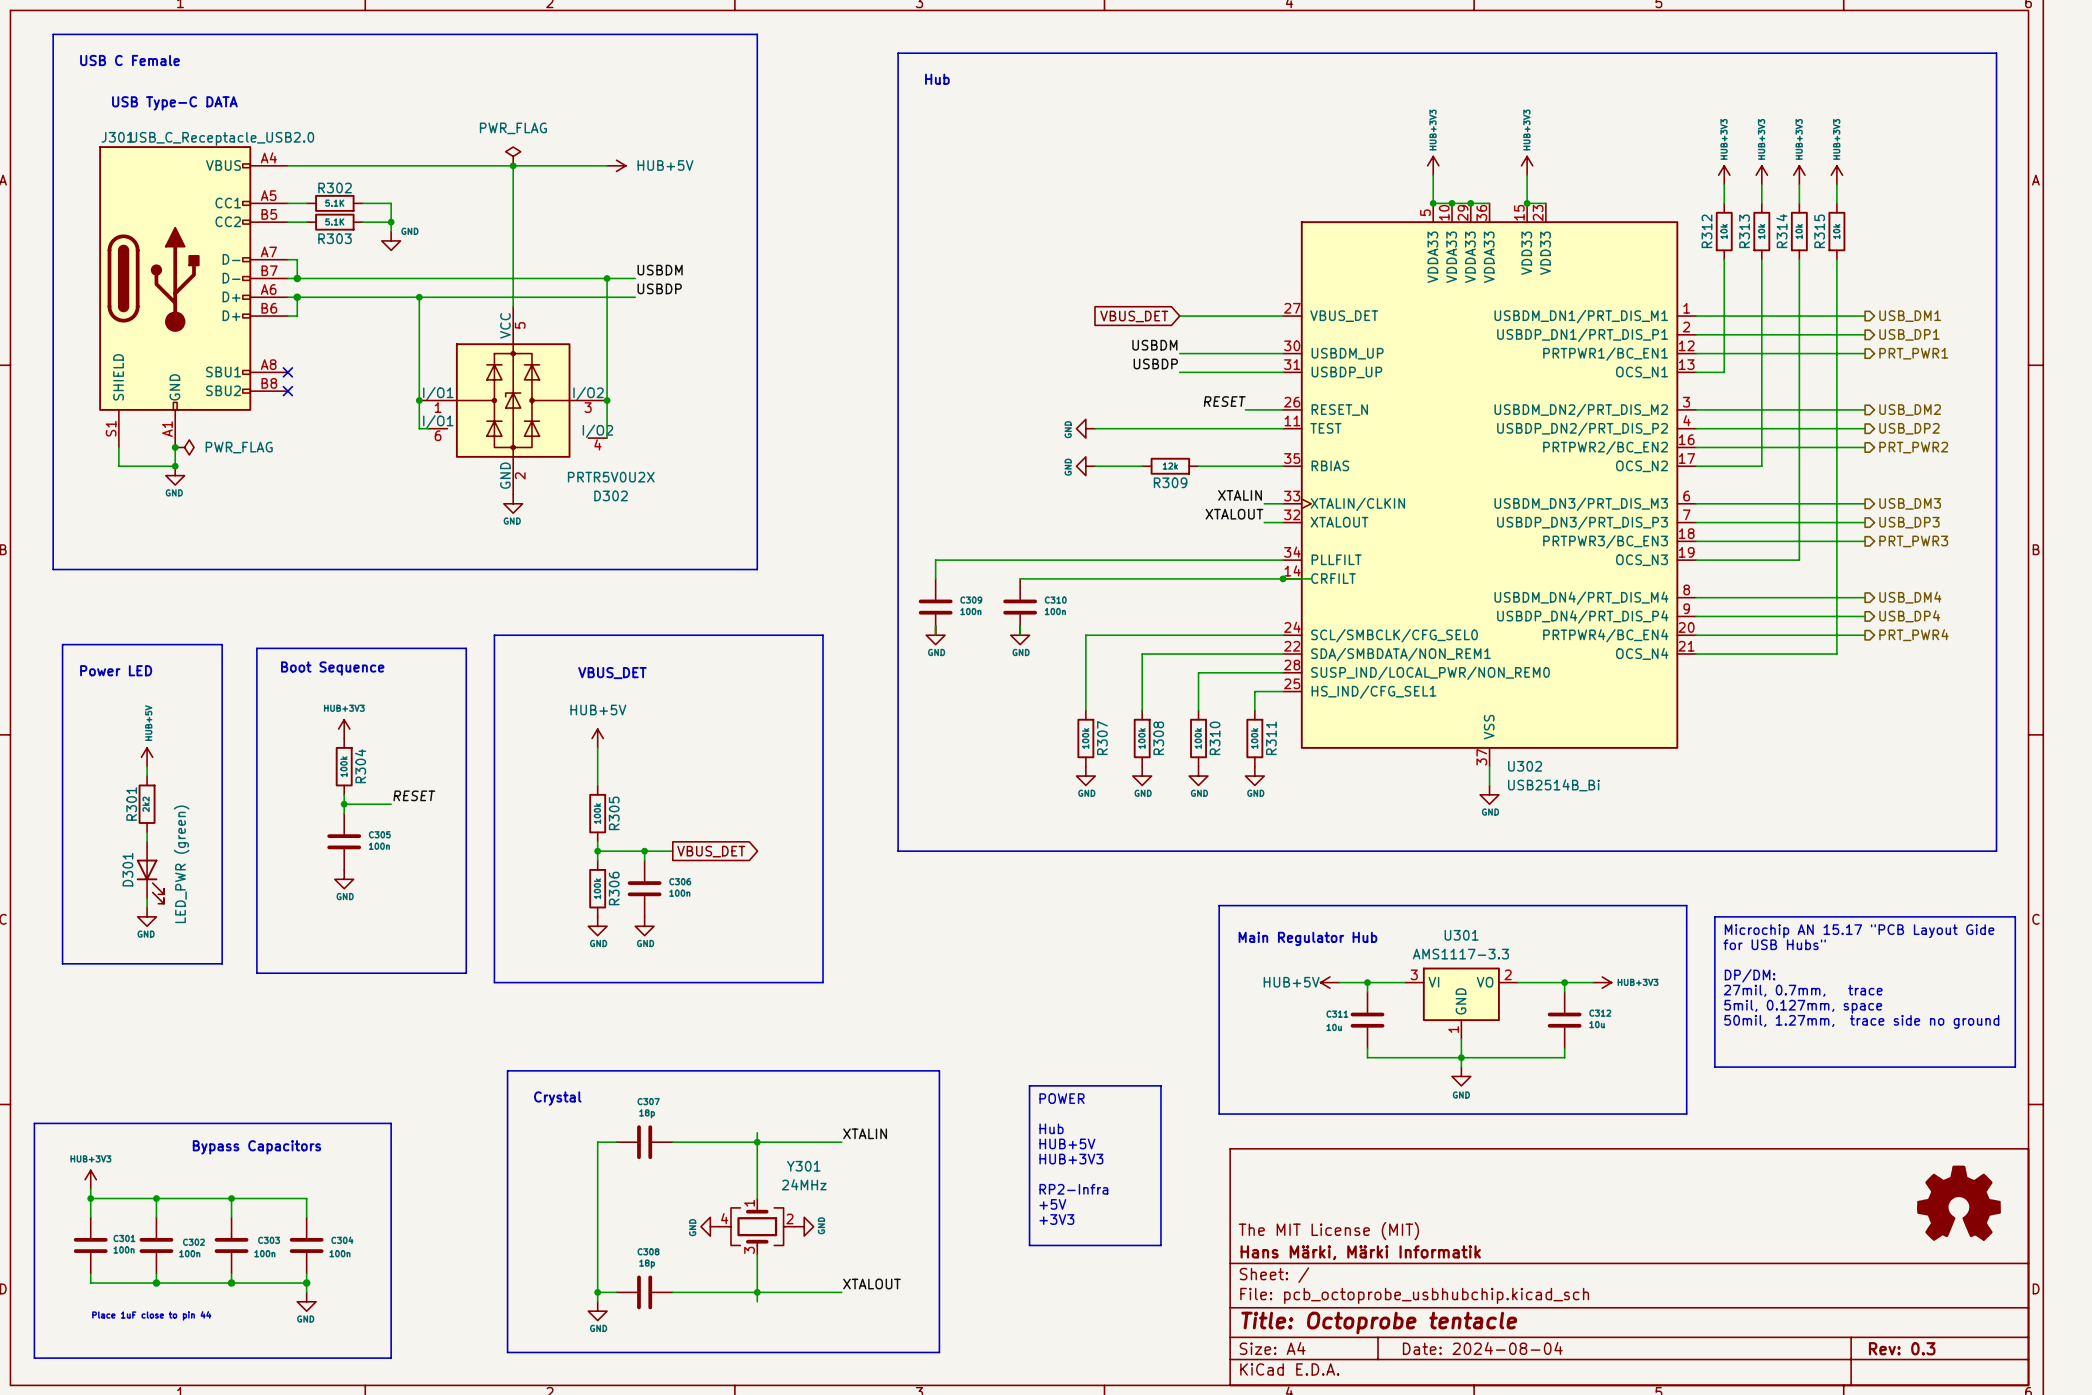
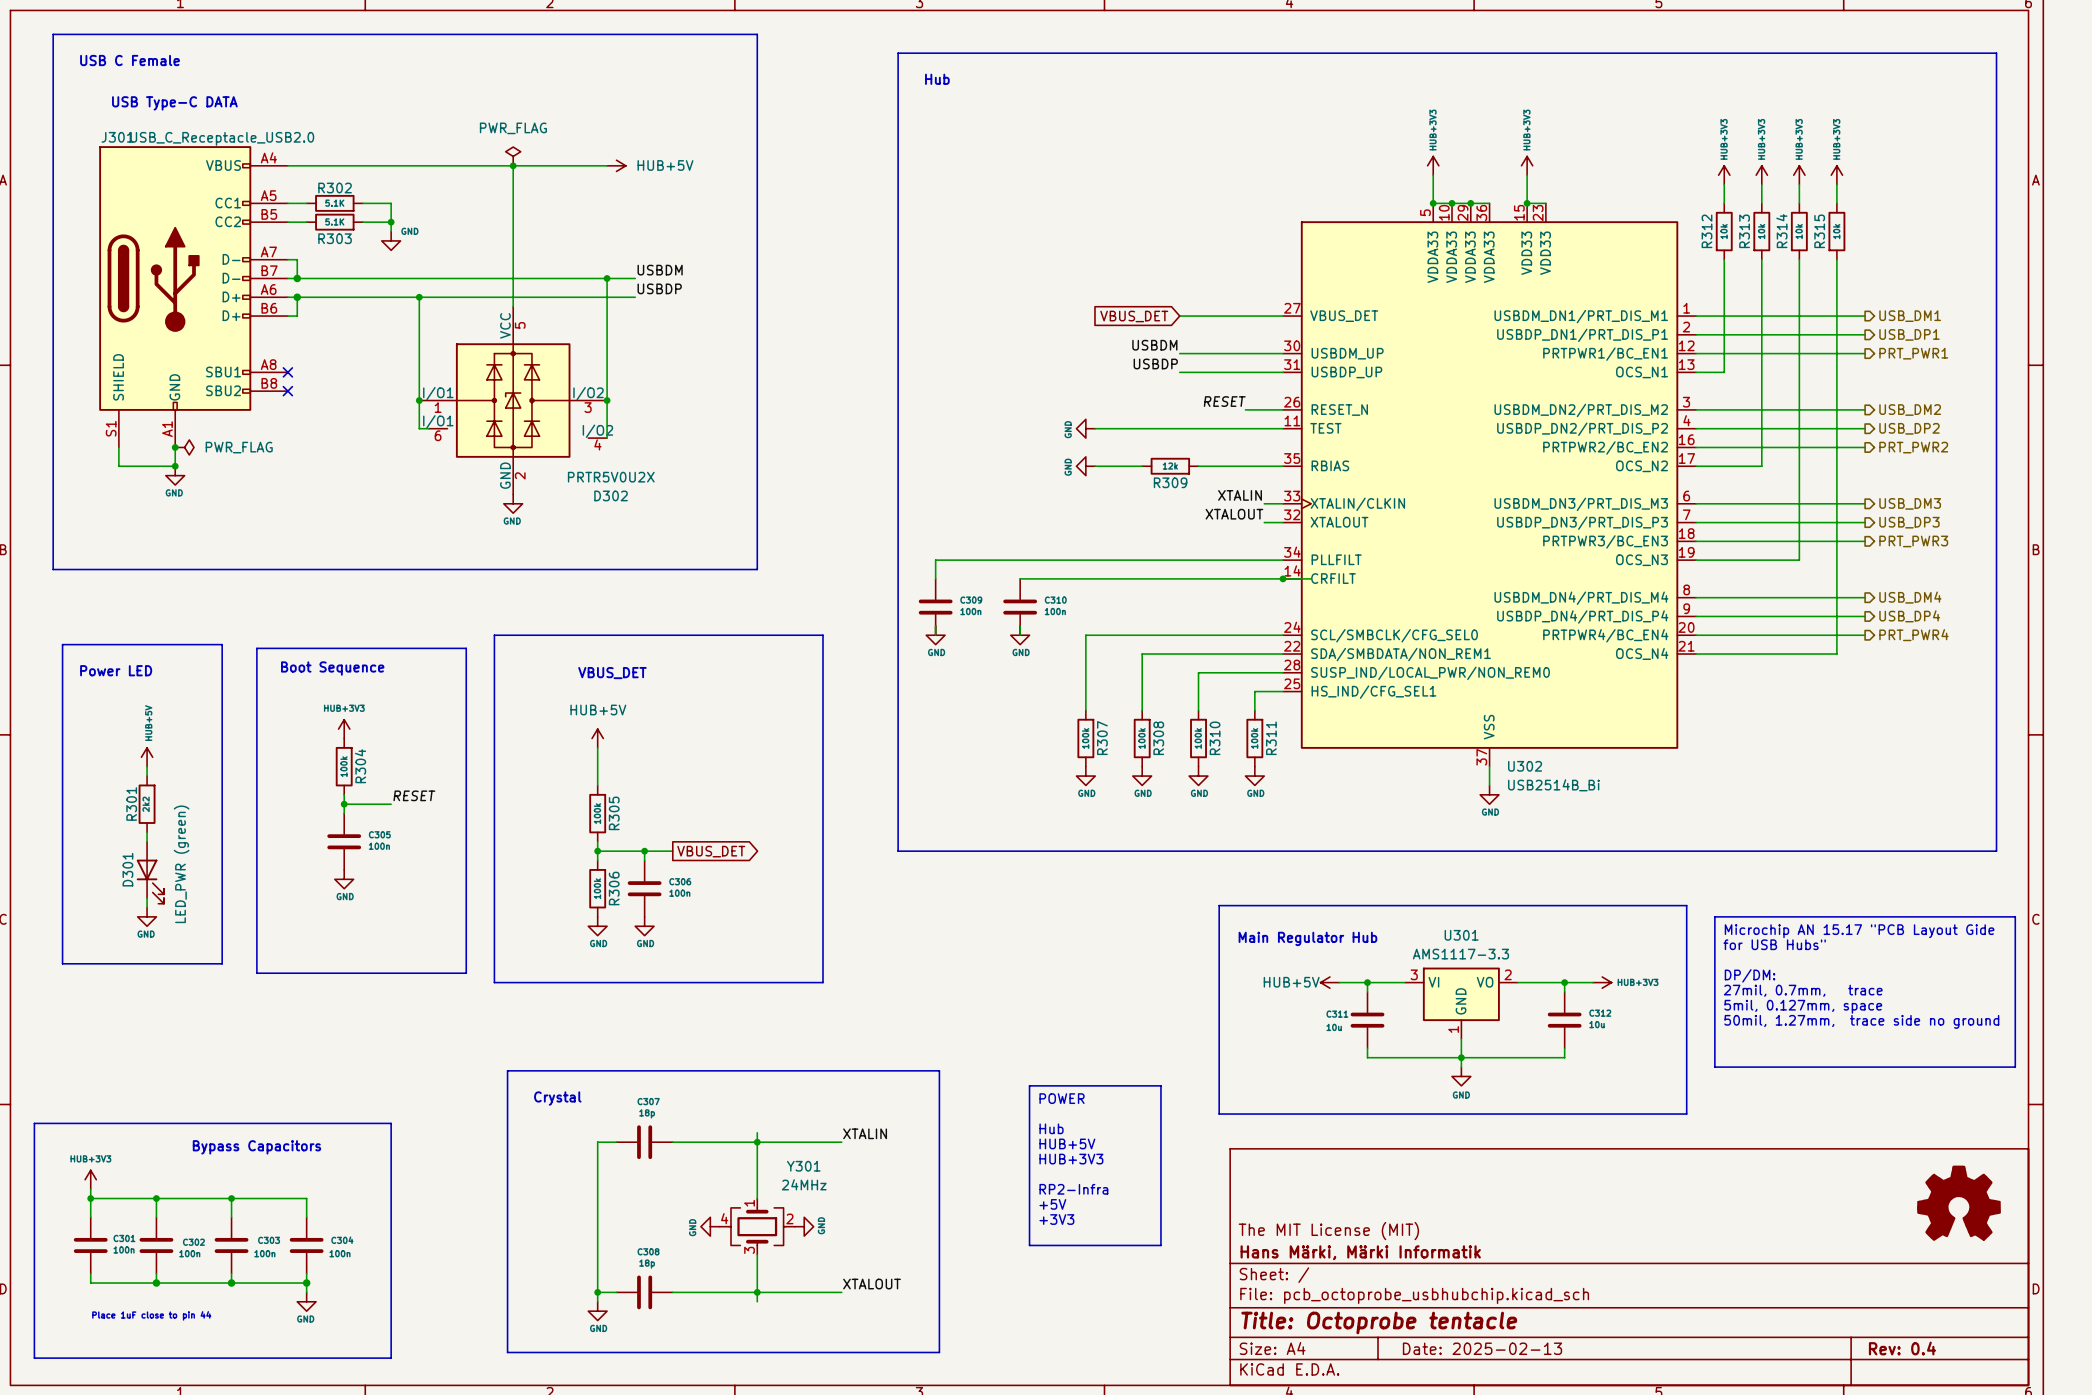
title block: Date: 2024-08-04 (1482, 1348) -> Date: 2025-02-13 (1482, 1348)
title block: Rev: 0.3 (1902, 1348) -> Rev: 0.4 (1902, 1348)

